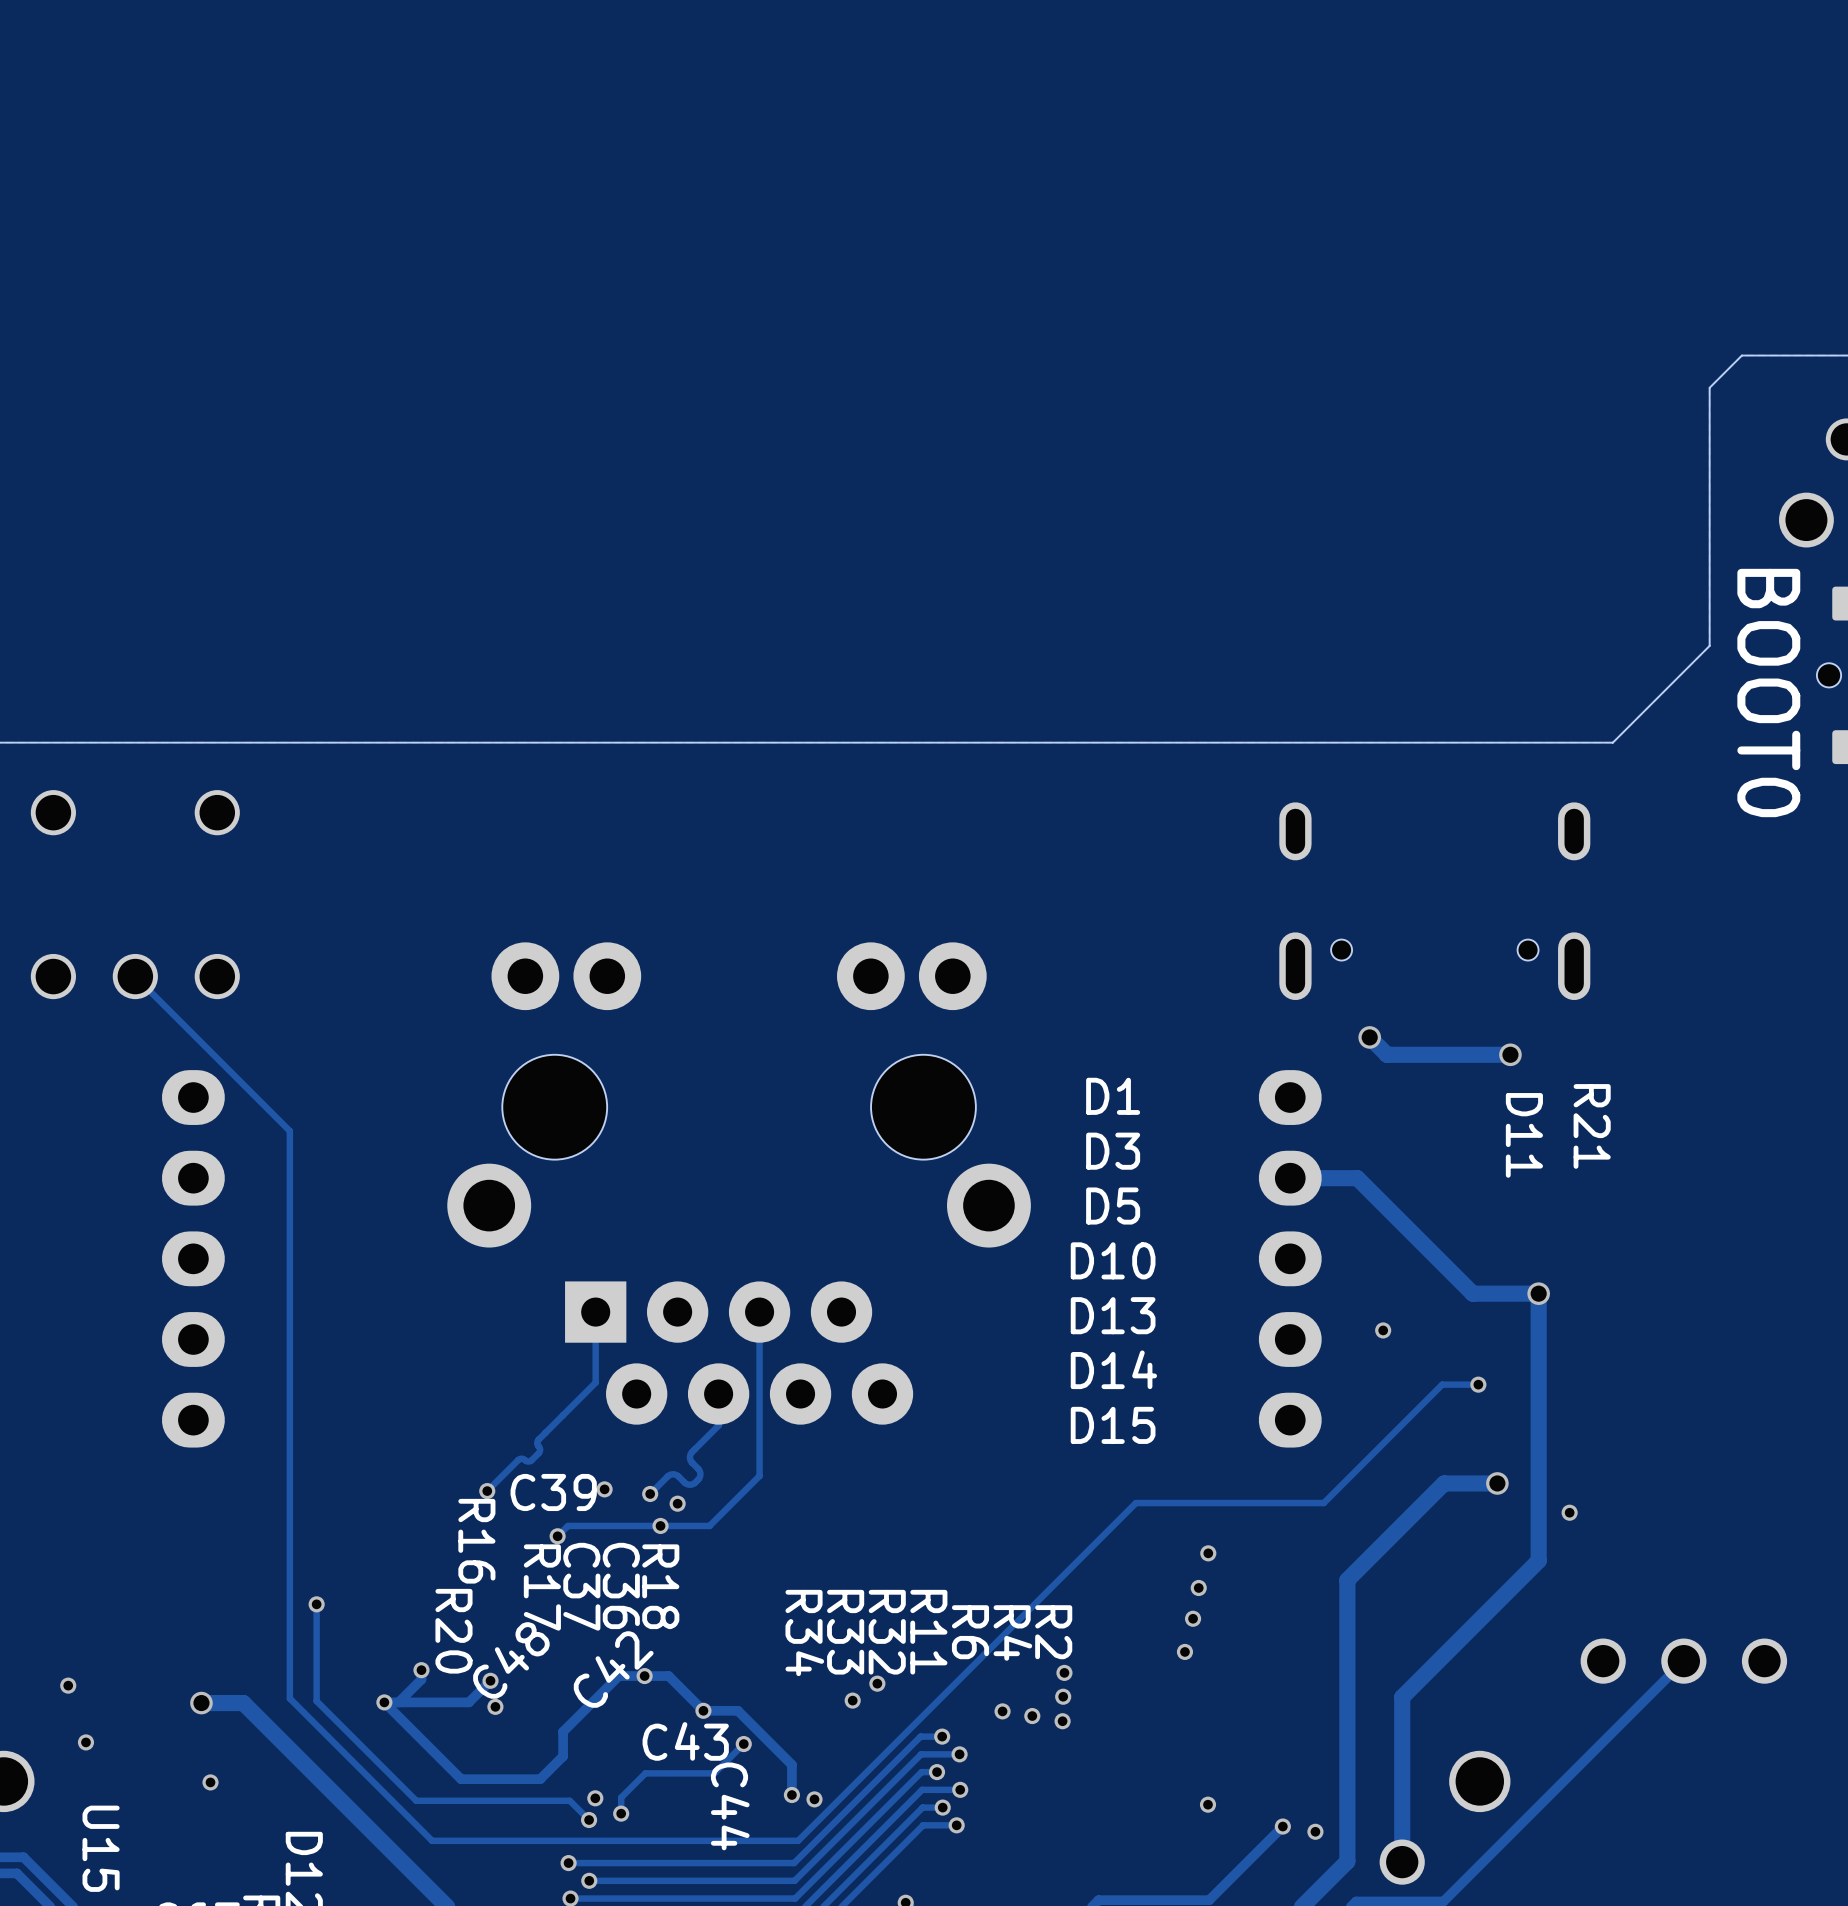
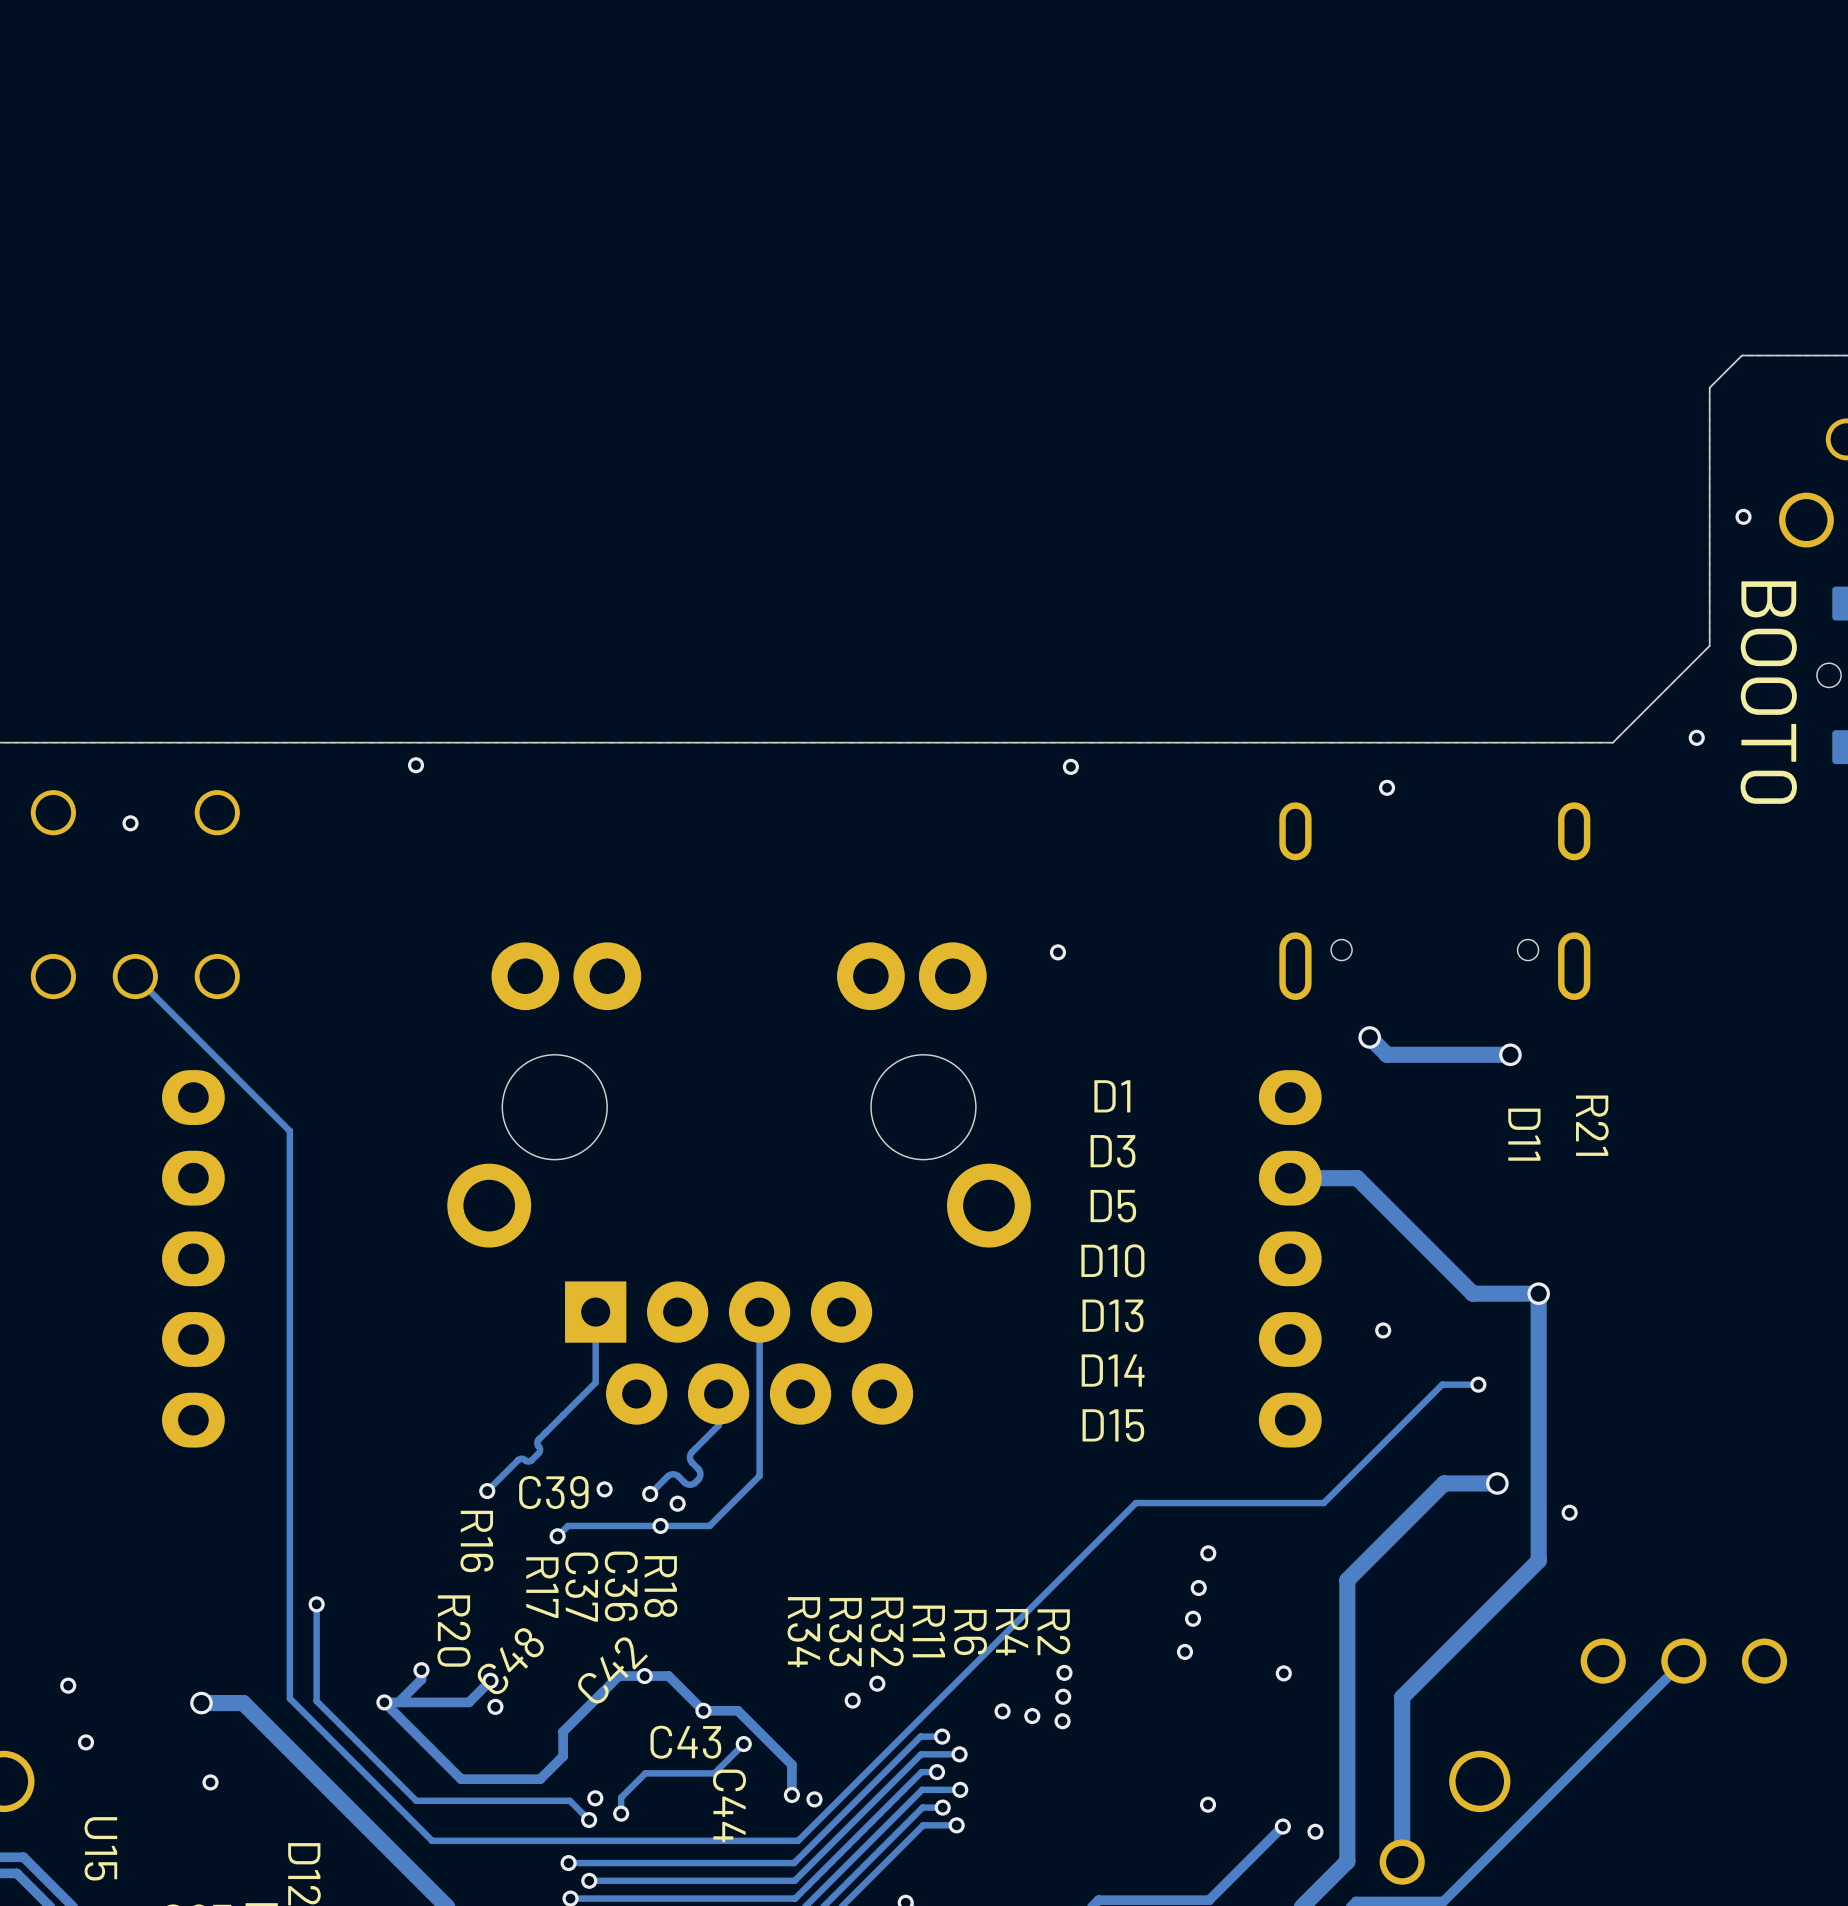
via: none -> (1743, 516)
via: none -> (1696, 737)
via: none -> (416, 765)
via: none -> (1070, 766)
via: none -> (1387, 787)
via: none -> (130, 823)
via: none -> (1057, 952)
via: none -> (1283, 1673)

